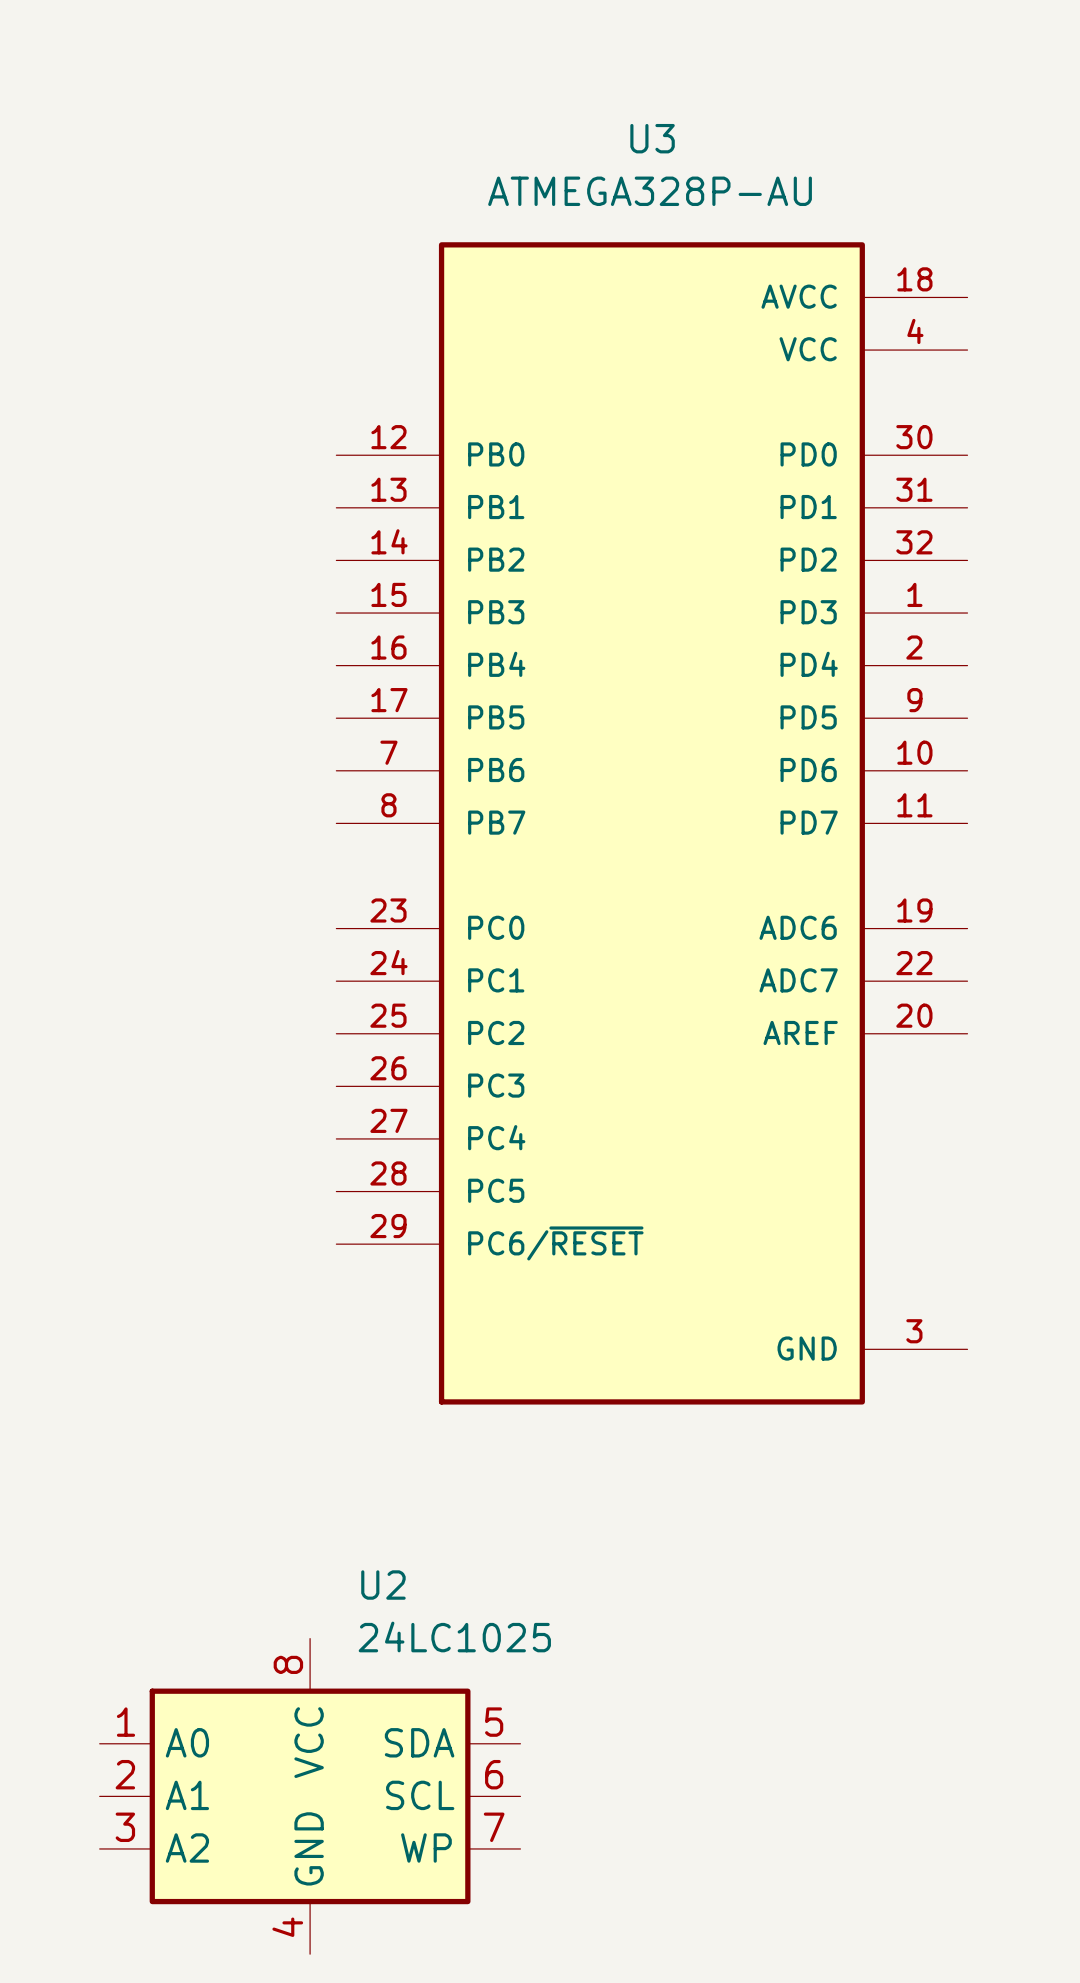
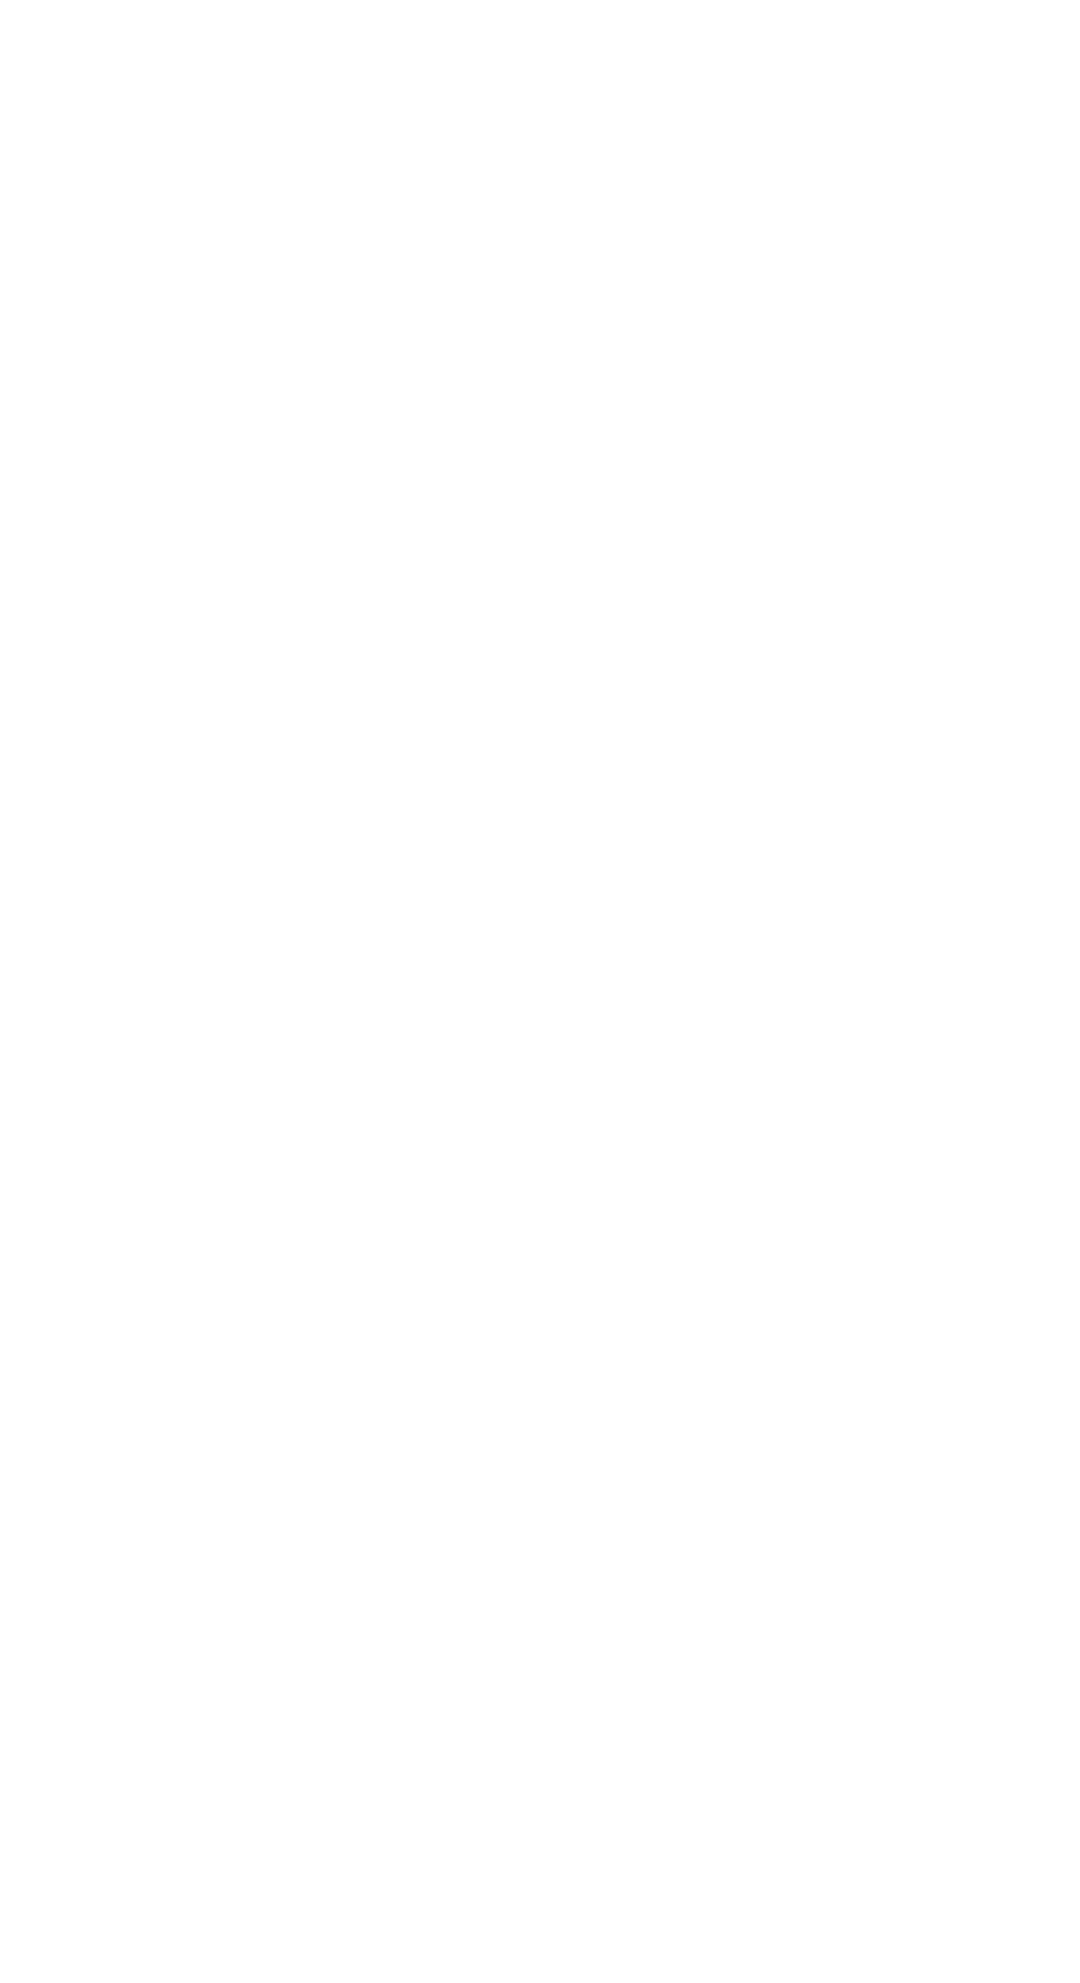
U3: ATMEGA328P-AU (651, 823) -> none
U2: 24LC1025 (310, 1796) -> none

